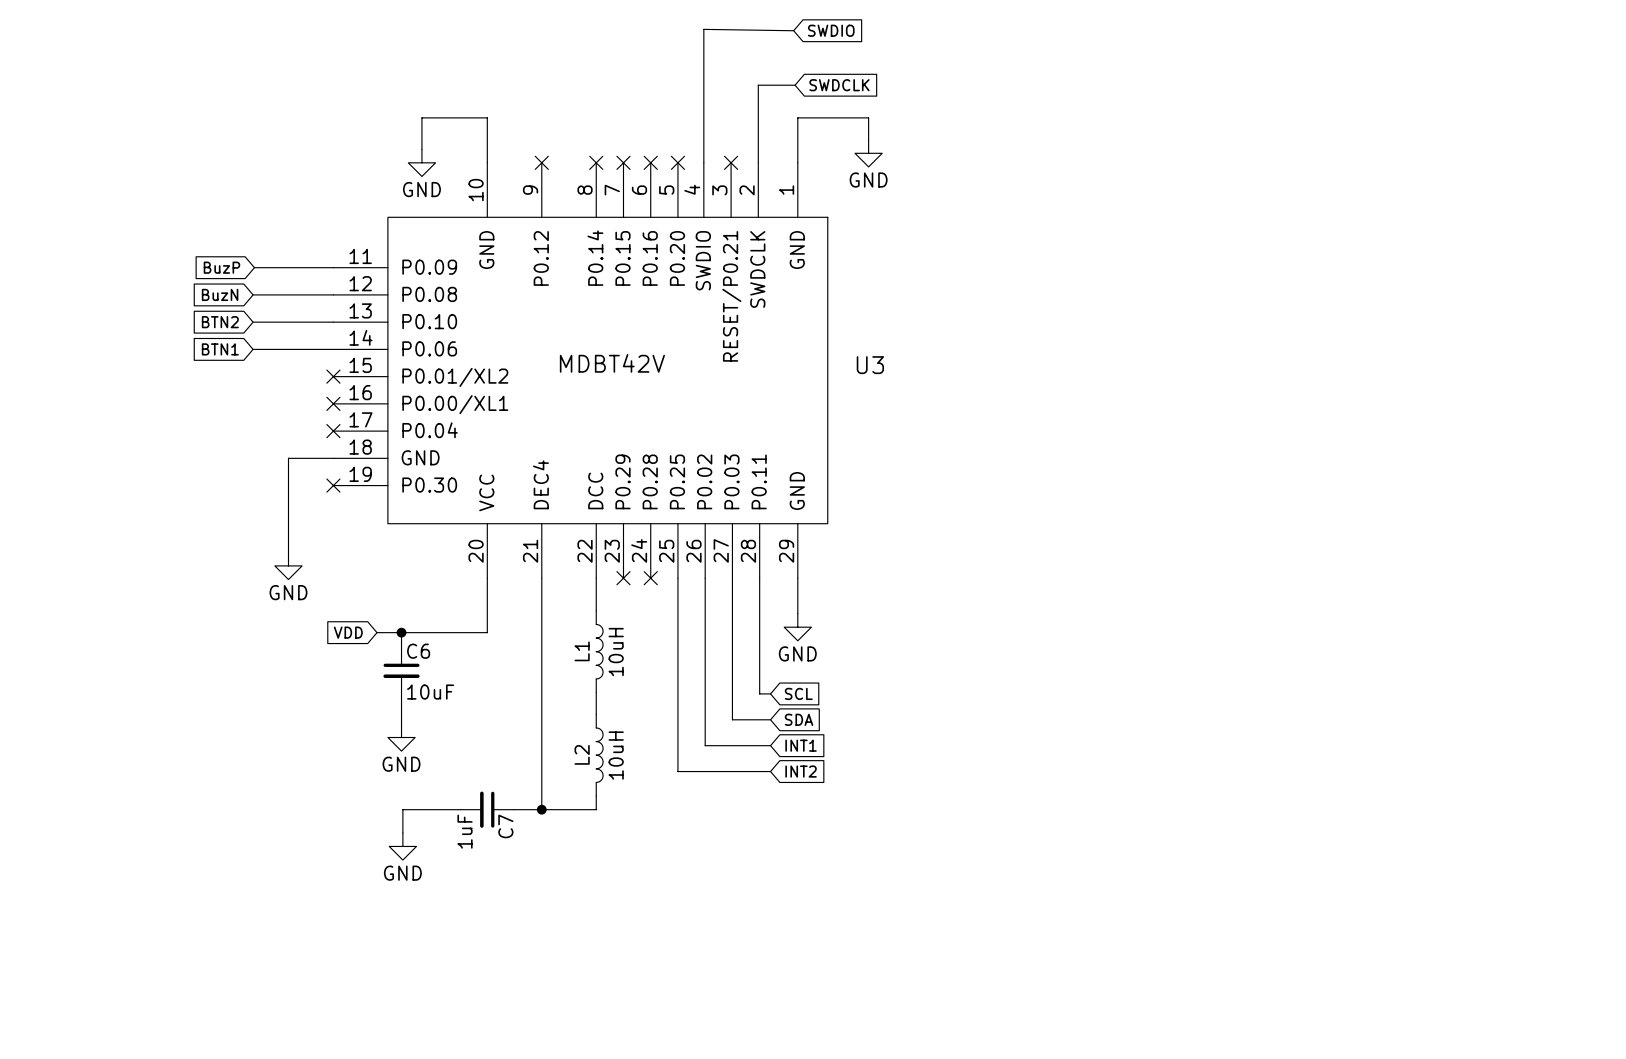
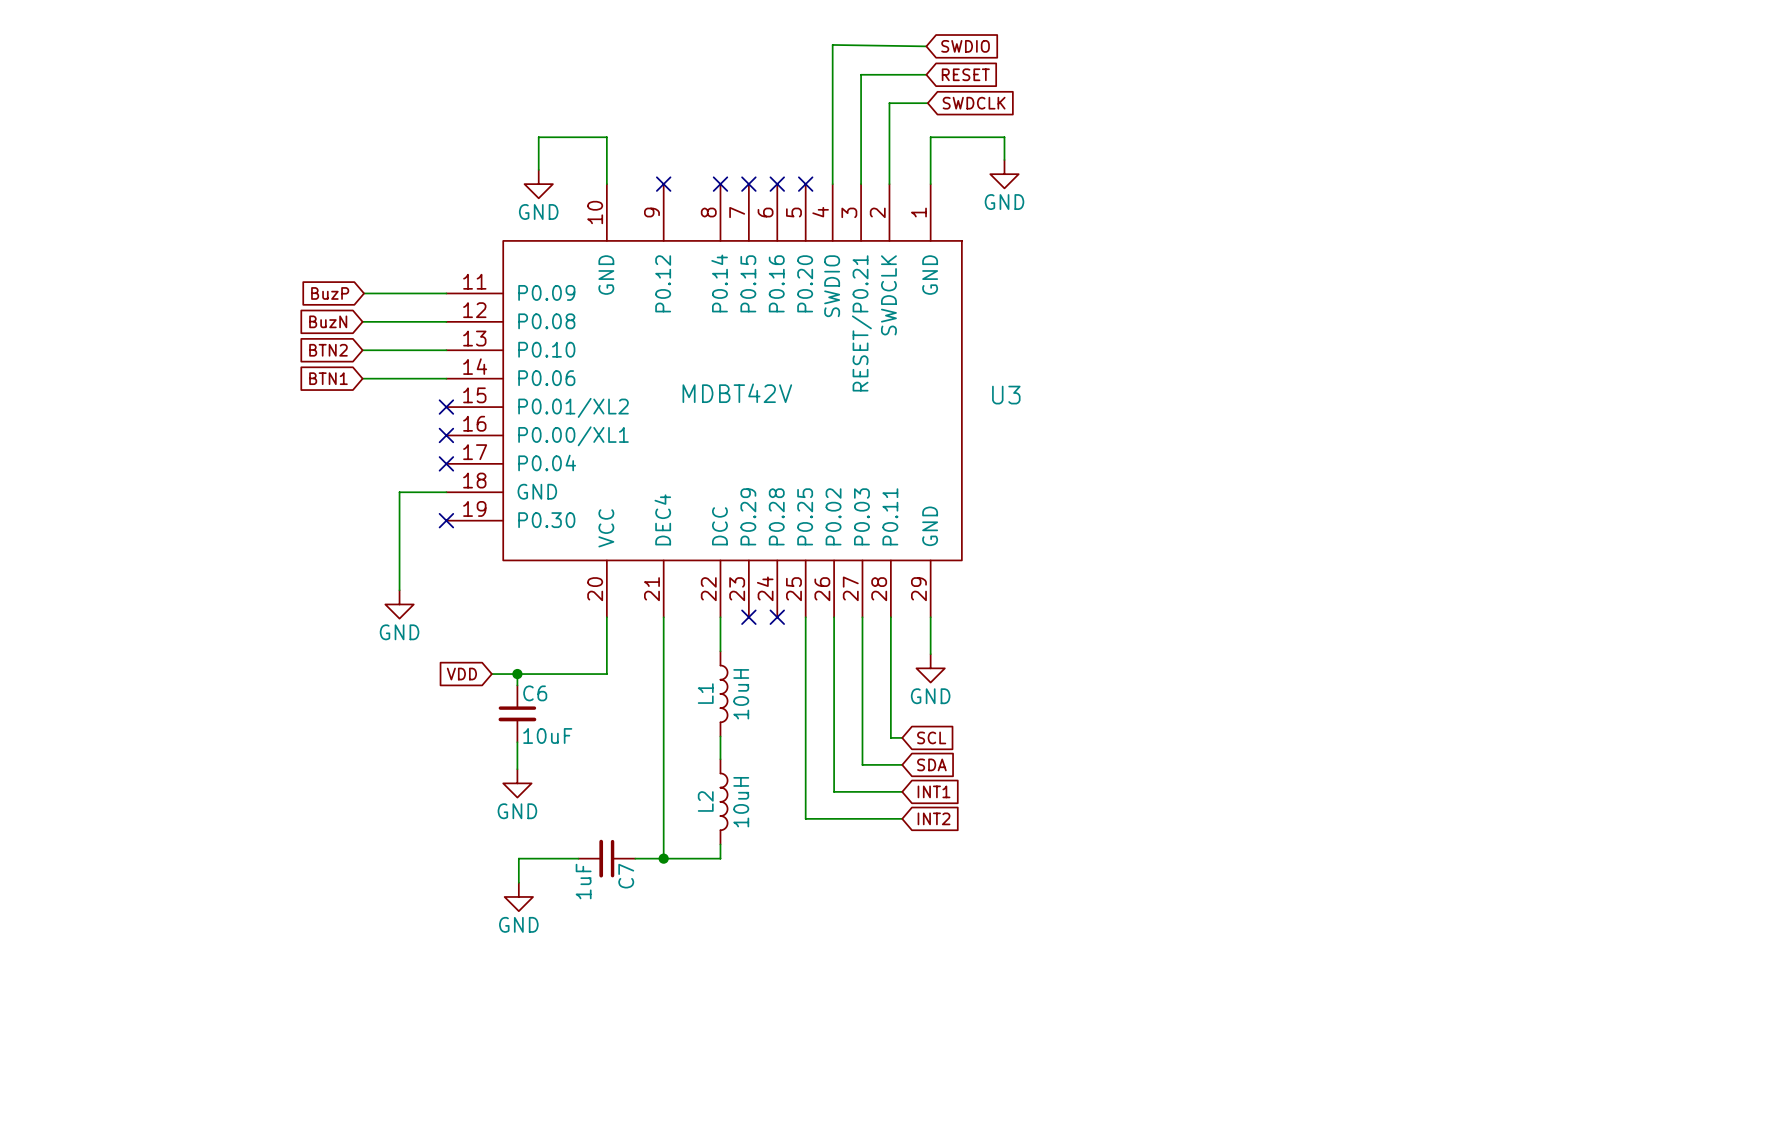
wire: none -> (926, 74) (861, 74) (861, 184)
global label: none -> RESET (965, 74)
no-connect mark: (731, 162) -> none

